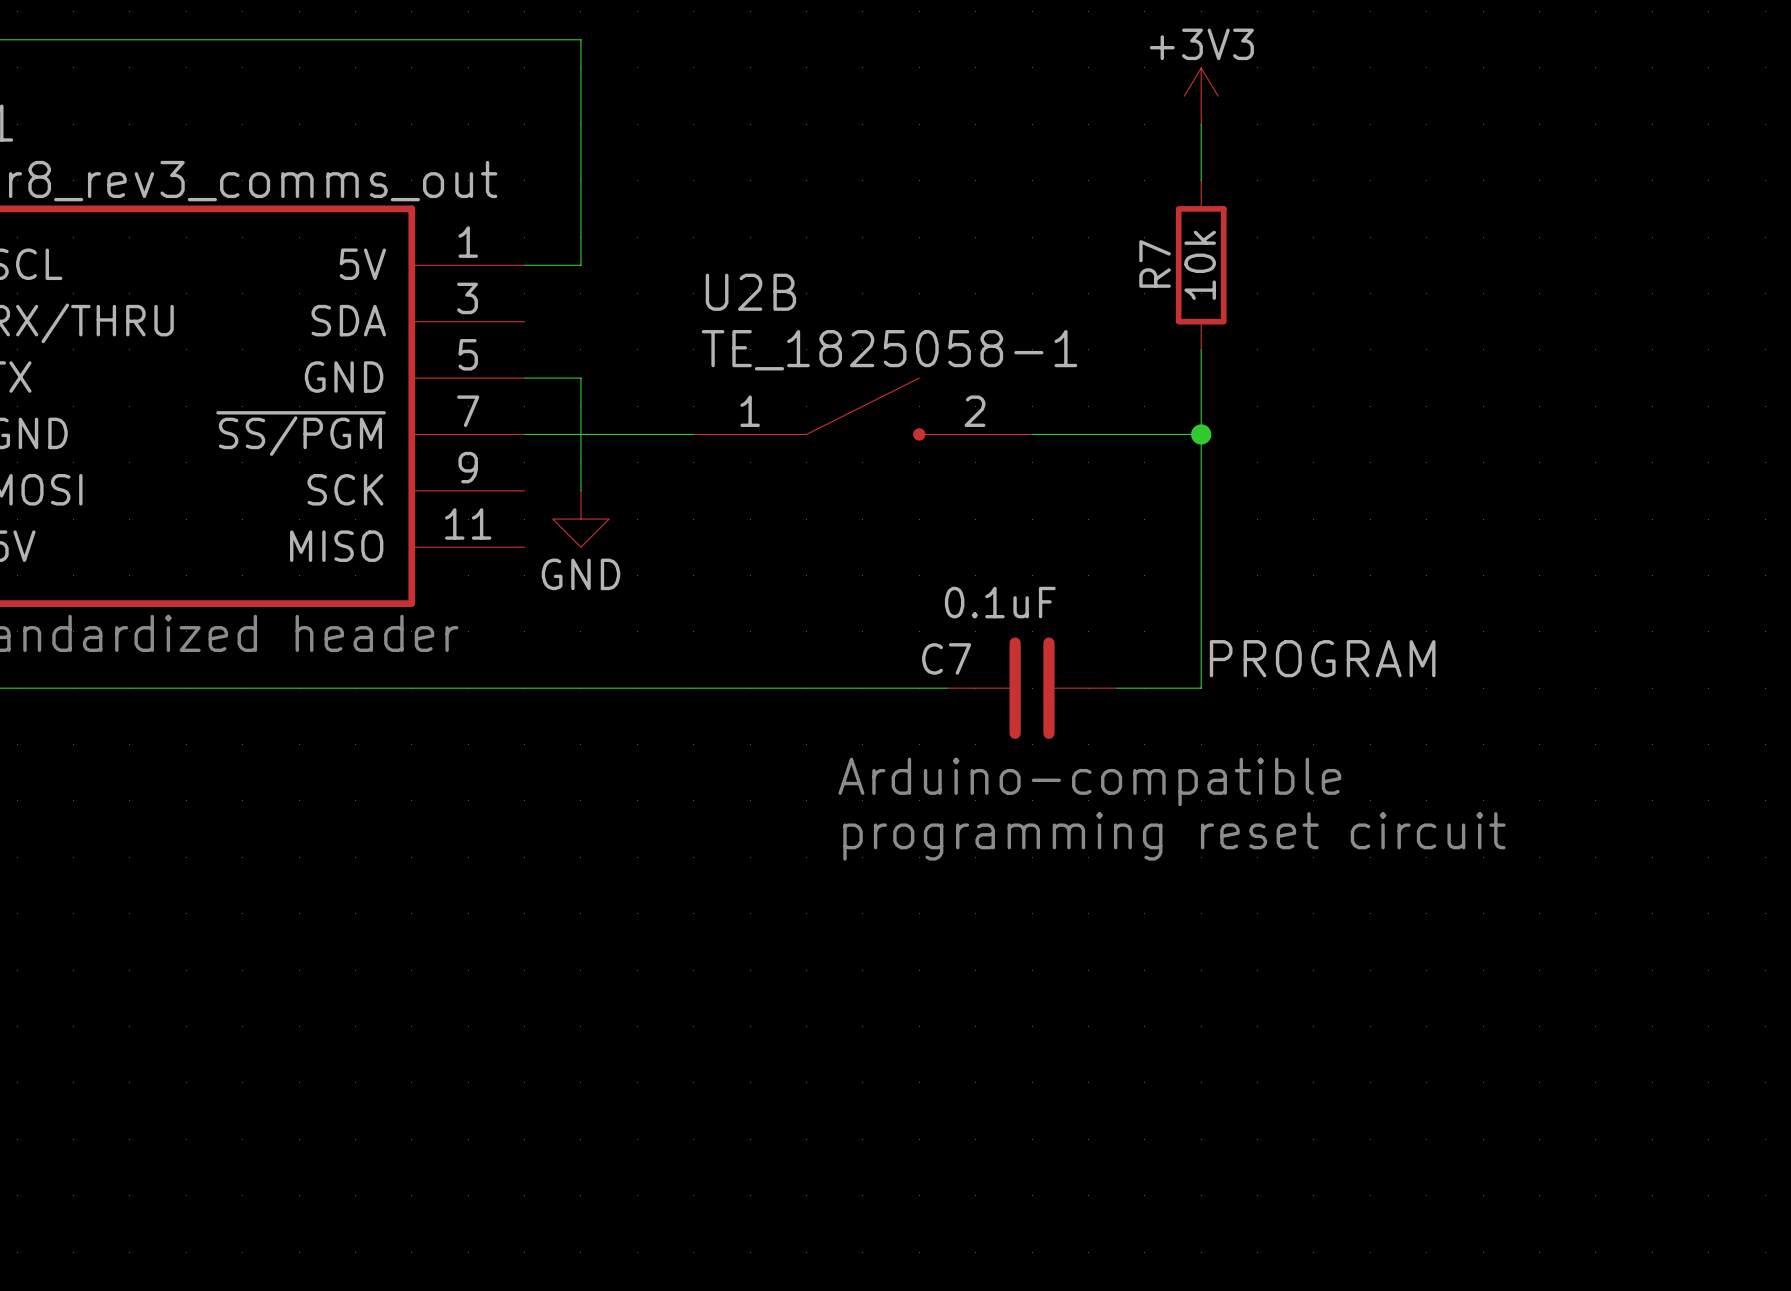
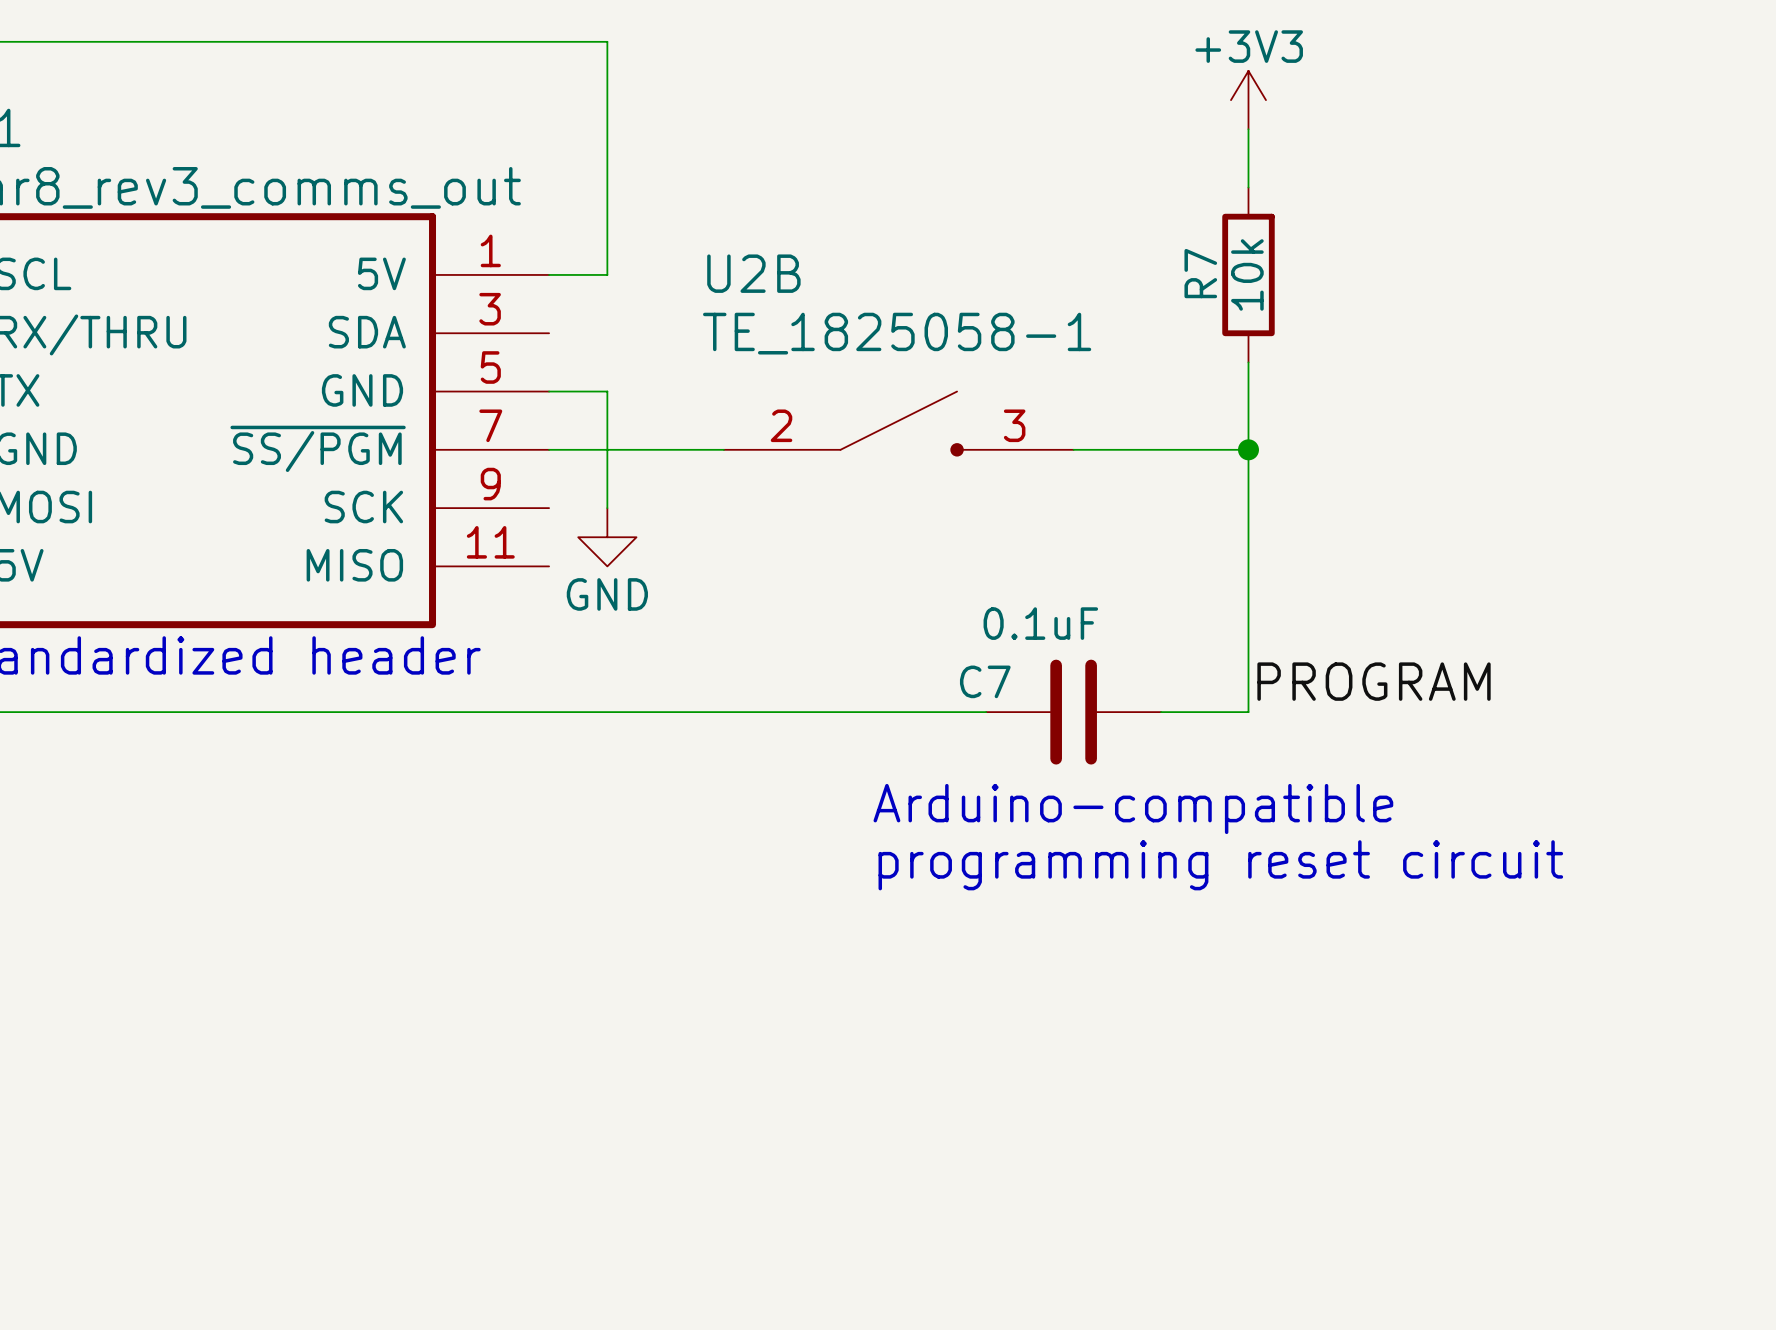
U2B name position: U2B (750, 292) -> U2B (753, 273)
U2B value position: TE_1825058-1 (889, 350) -> TE_1825058-1 (897, 333)
U2B pin number: 1 (750, 411) -> 2 (781, 425)
U2B pin number: 2 (975, 411) -> 3 (1014, 425)

